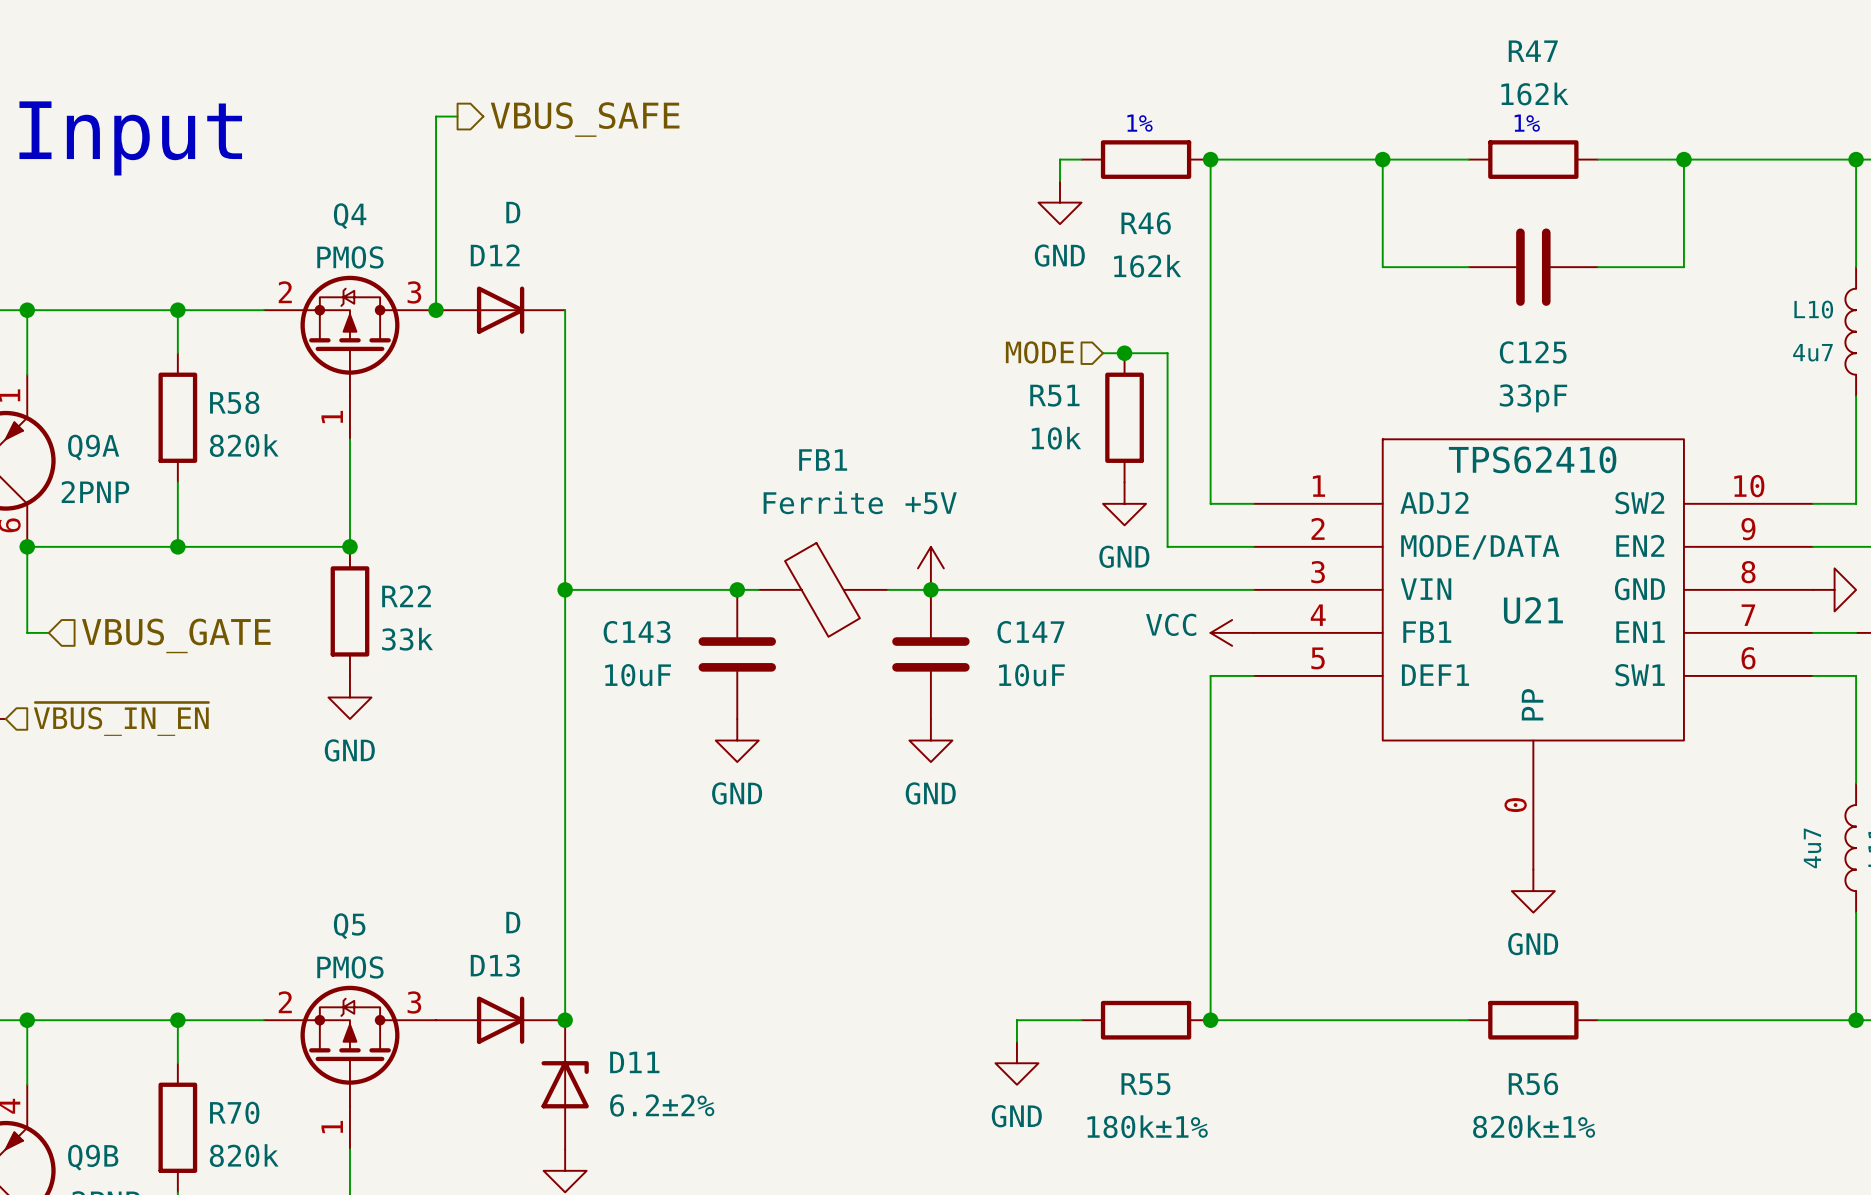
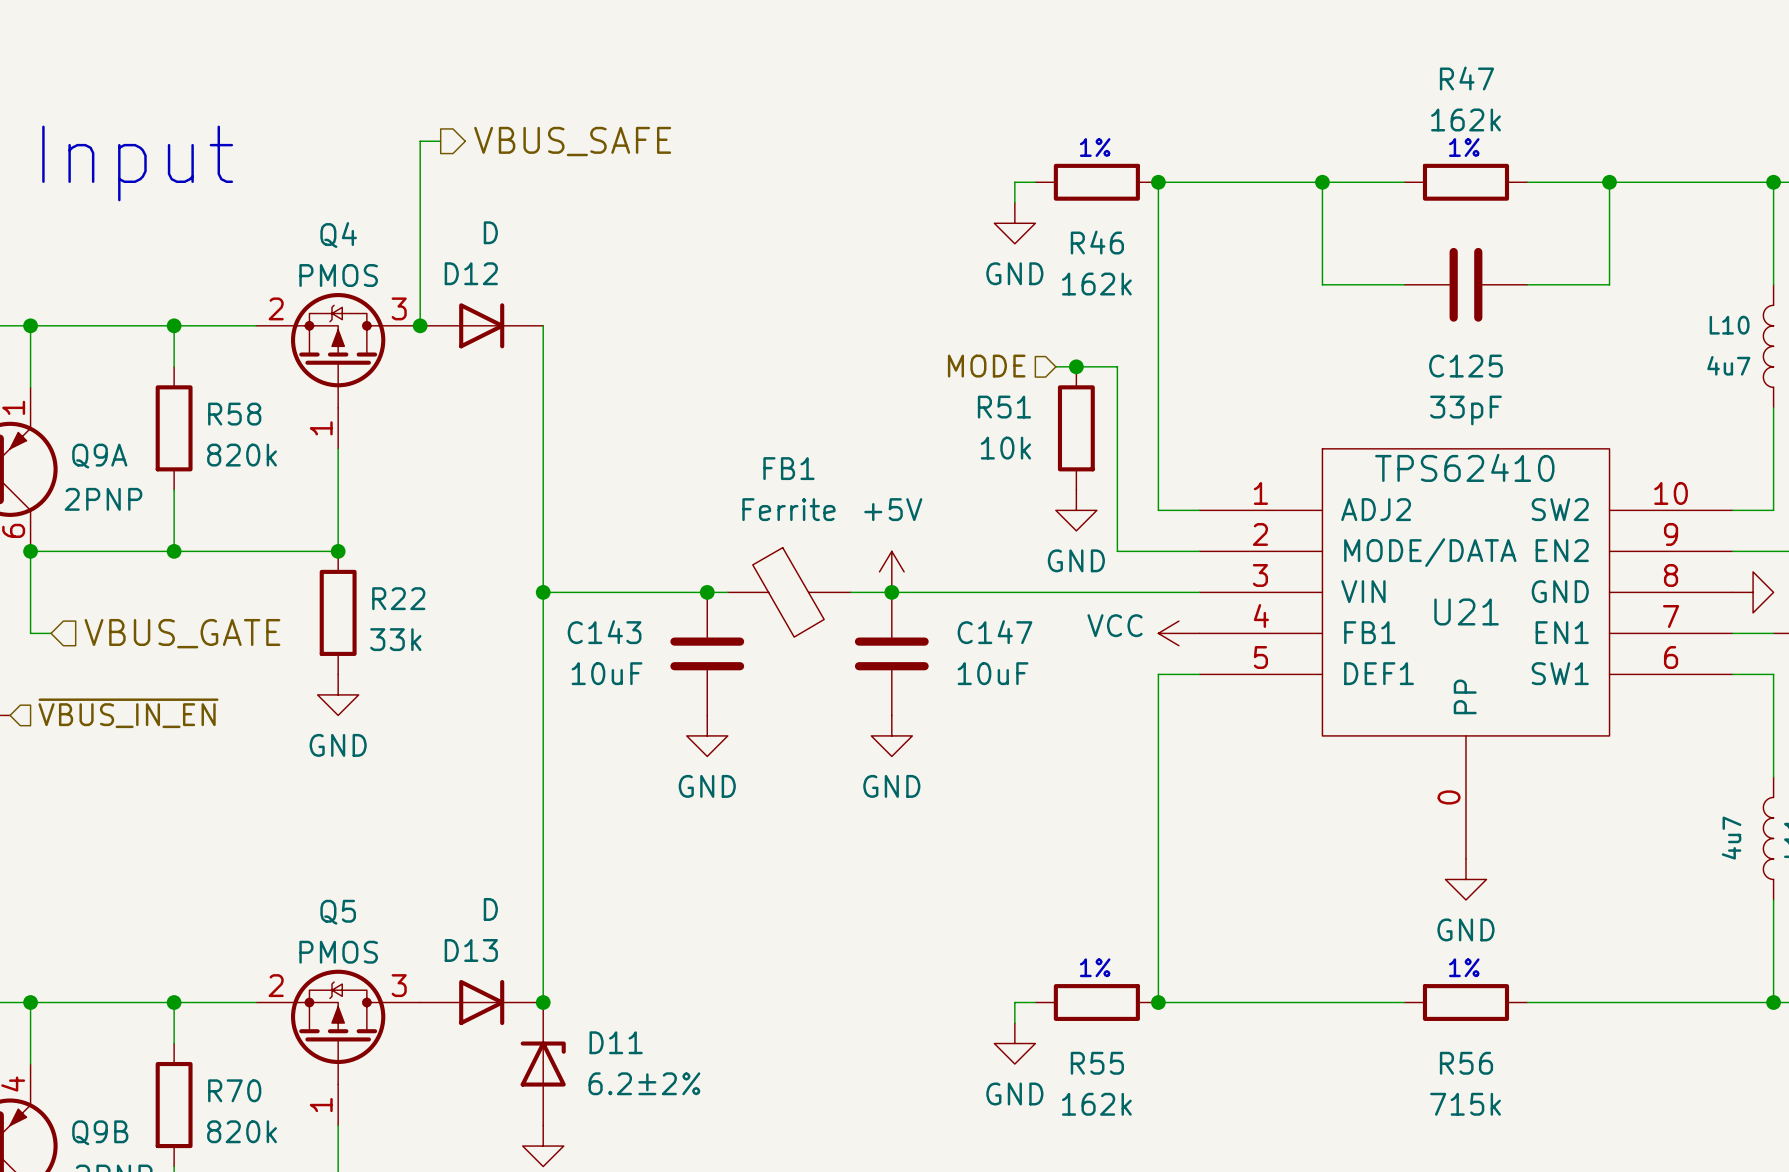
text: none -> 1% (1095, 967)
text: none -> 1% (1464, 967)
wire: (1060, 1020) (1016, 1020) (1016, 1041) -> (1014, 1002) (1014, 1023)
power symbol position: GND (1016, 1063) -> GND (1014, 1043)
R55 value: 180k±1% (1147, 1126) -> 162k (1096, 1104)
R56 value: 820k±1% (1534, 1126) -> 715k (1465, 1104)

